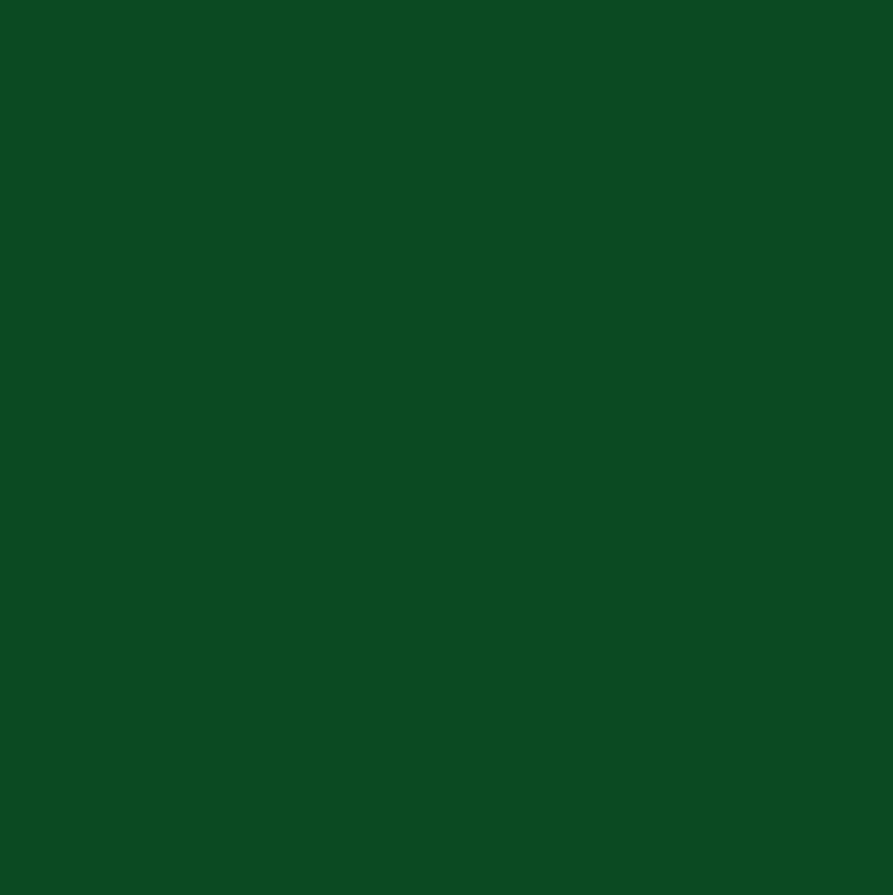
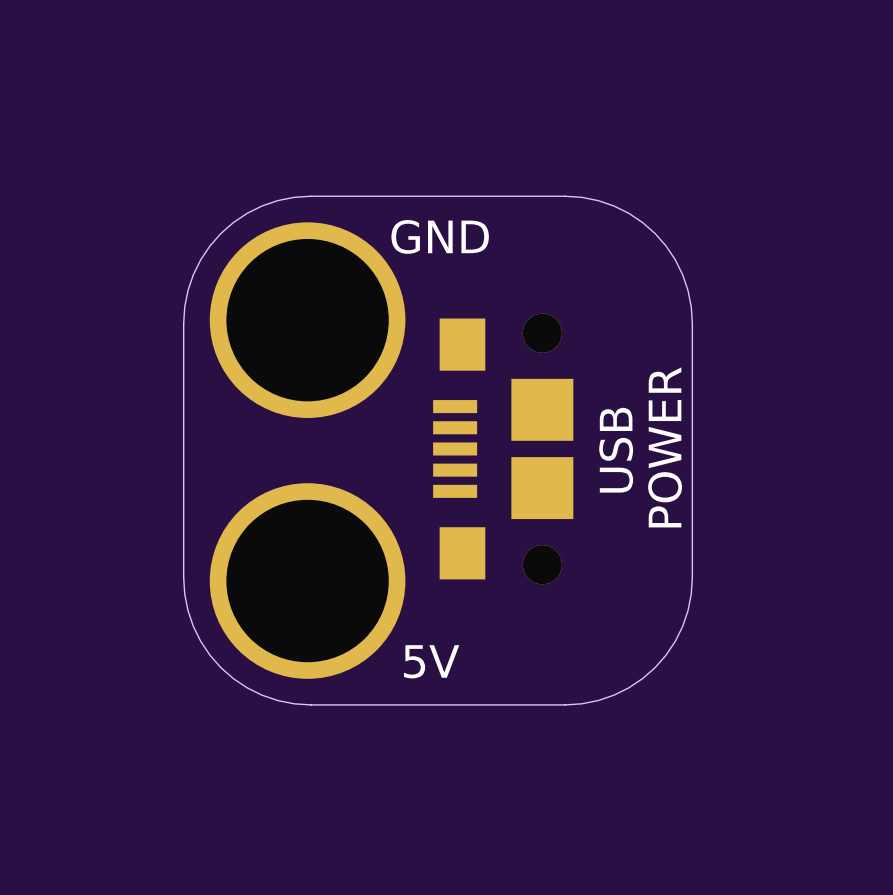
part: none -> (438, 450)

